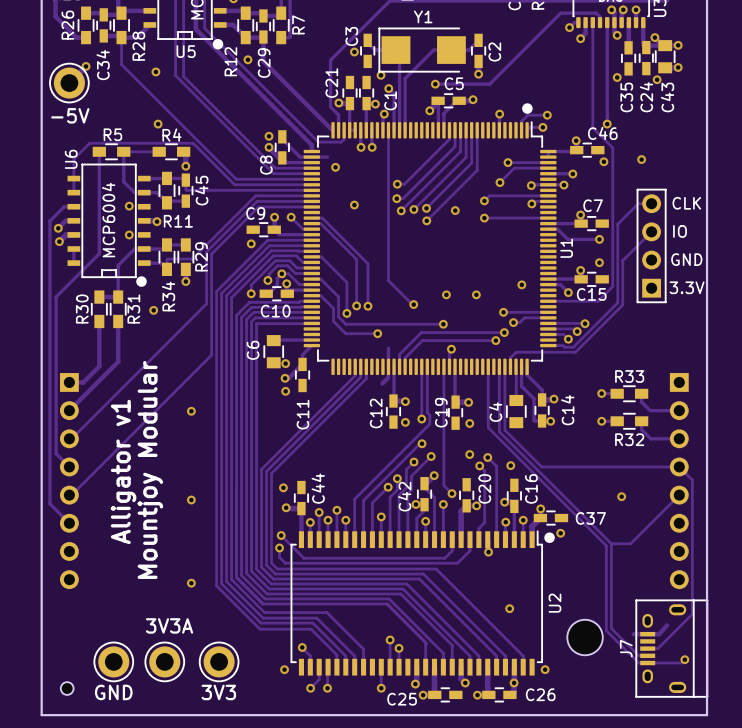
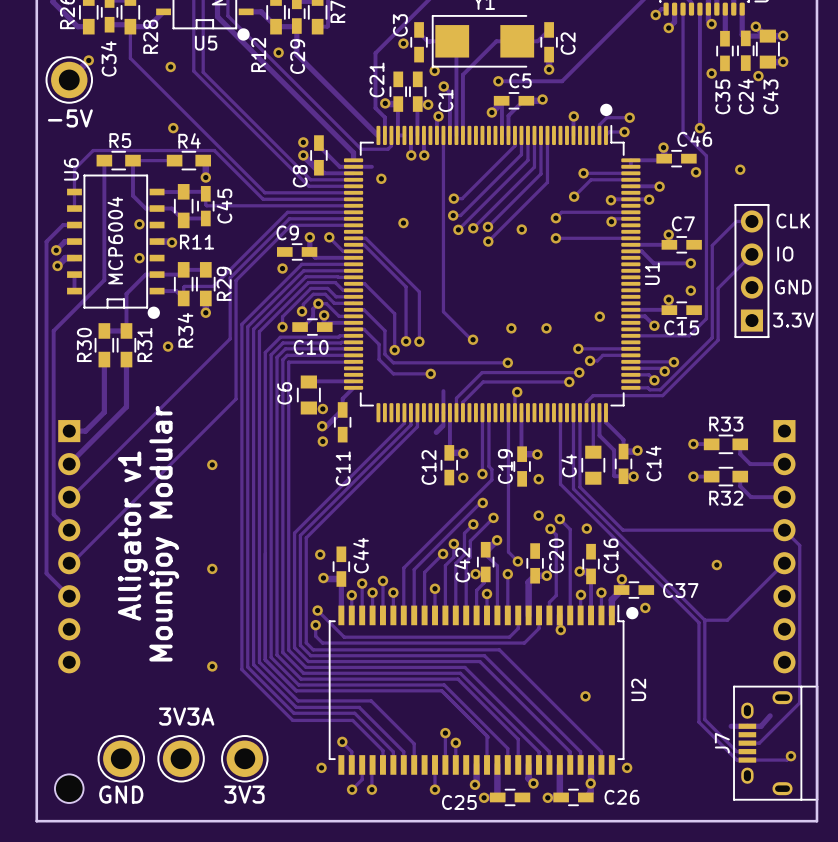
part: (585, 637) -> none
part footprint: [60, 682, 74, 695] -> [54, 774, 84, 803]

